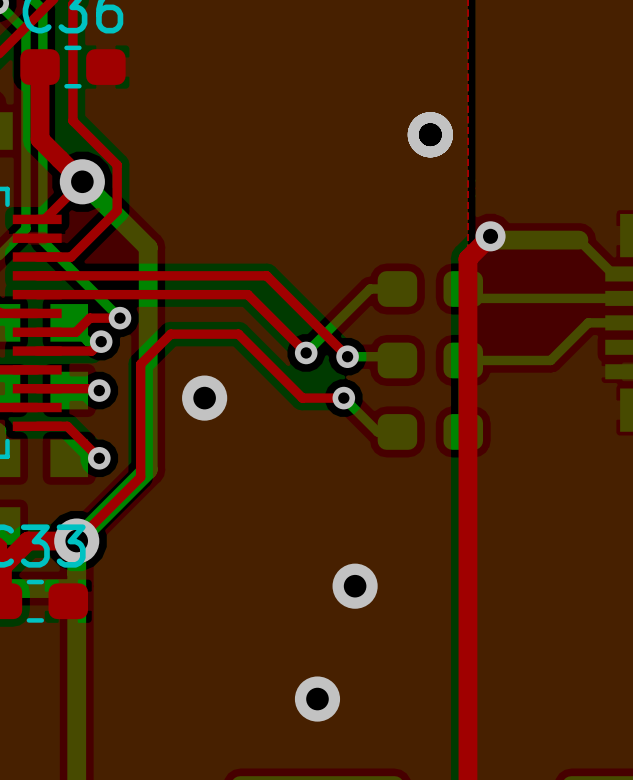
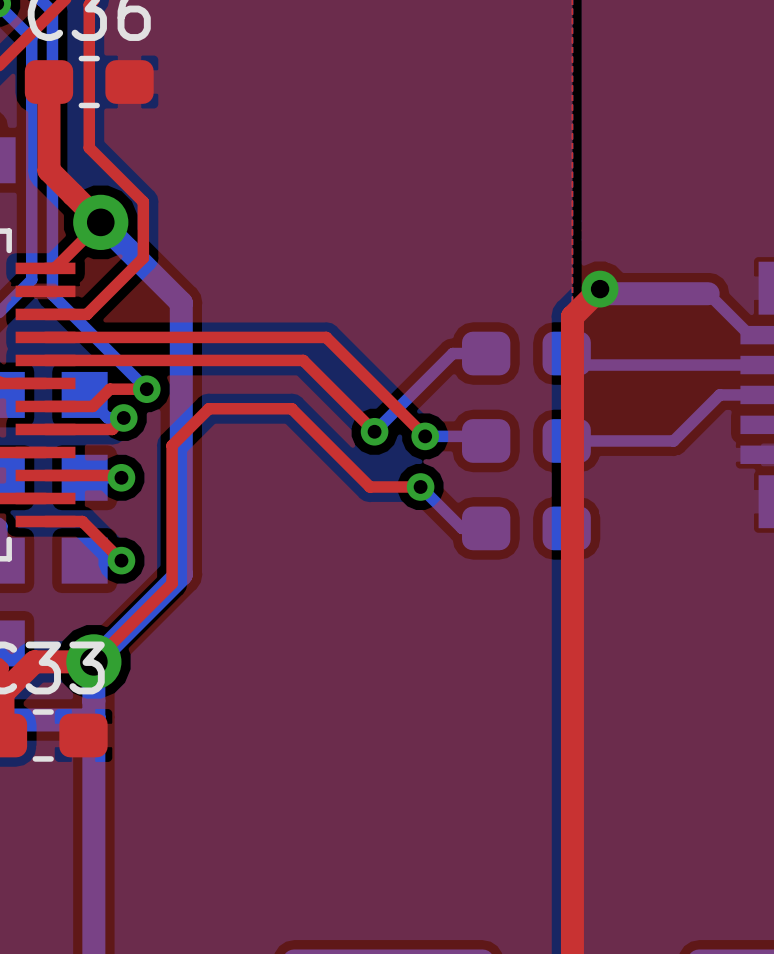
via: (430, 134) -> none
via: (204, 398) -> none
via: (355, 586) -> none
via: (317, 699) -> none

